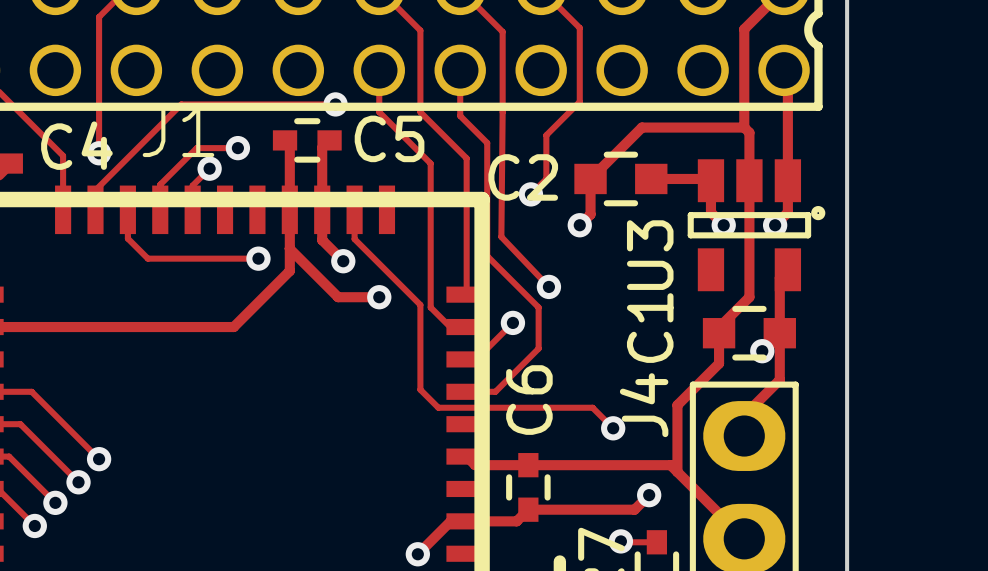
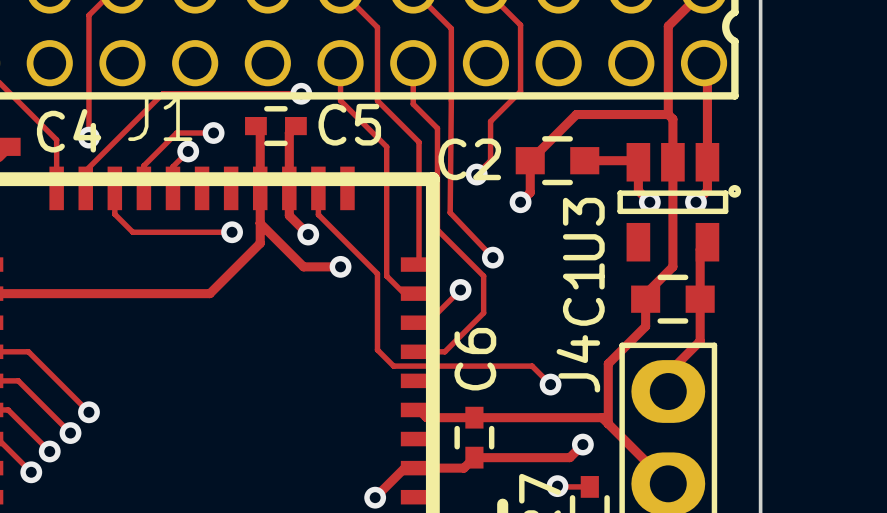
via: (762, 351) -> none

